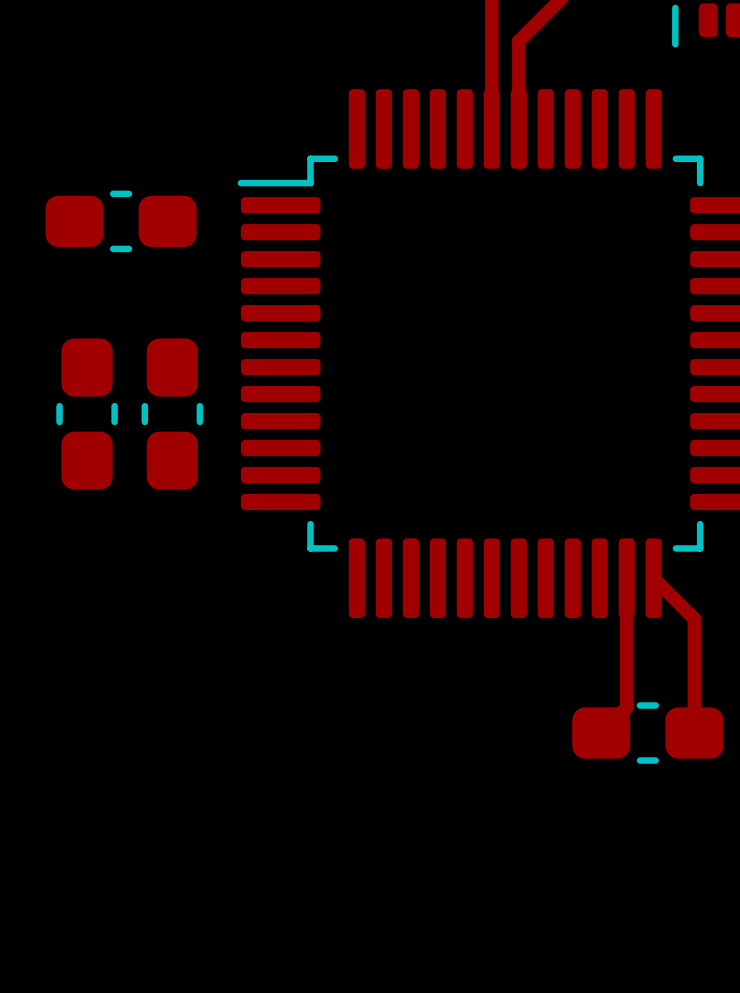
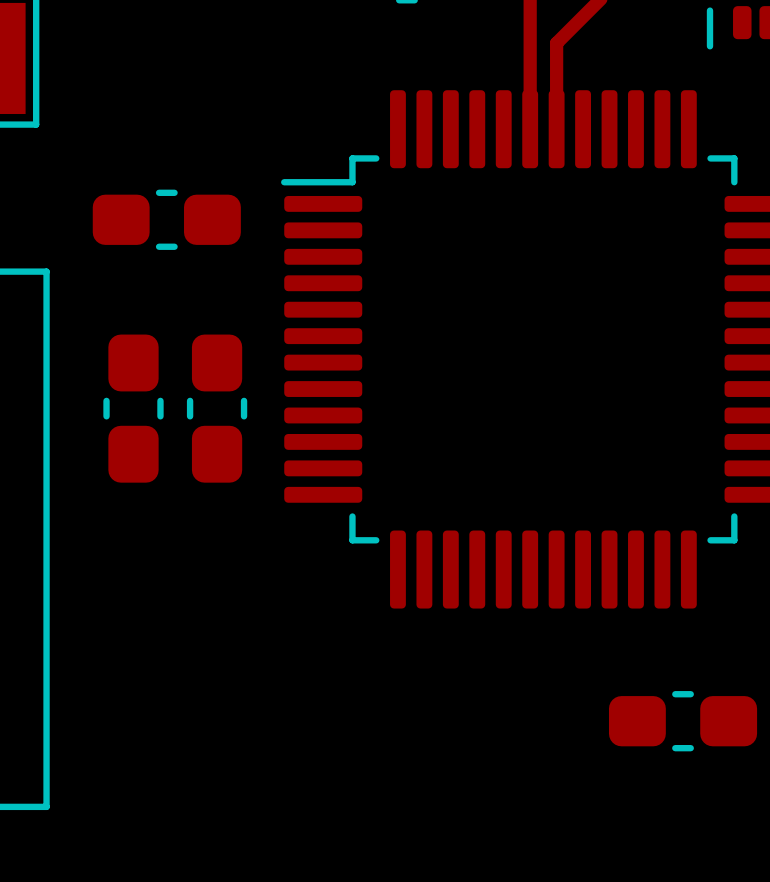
track: (626, 578) (626, 707) (601, 733) -> none
track: (653, 578) (694, 618) (694, 733) -> none

